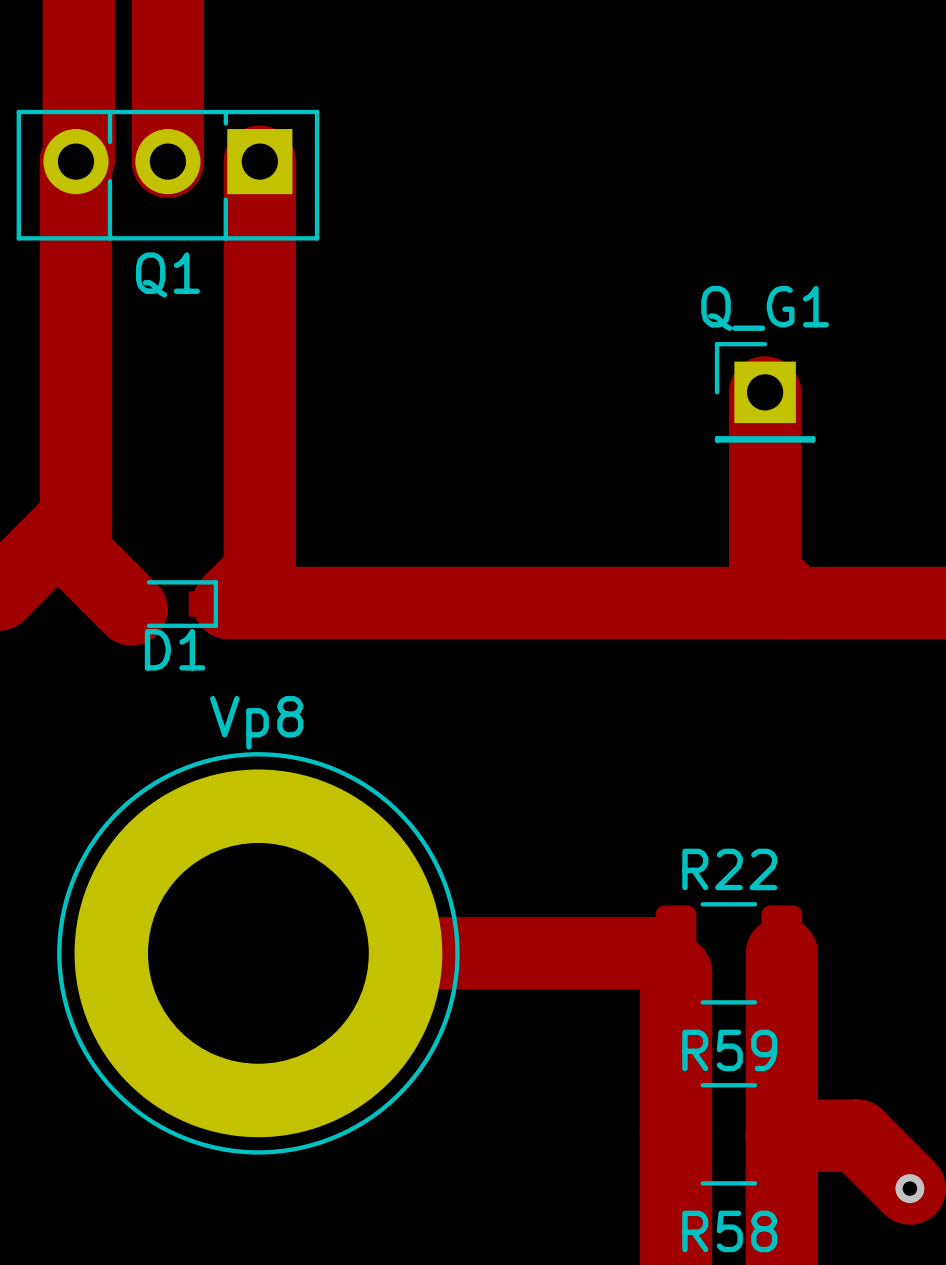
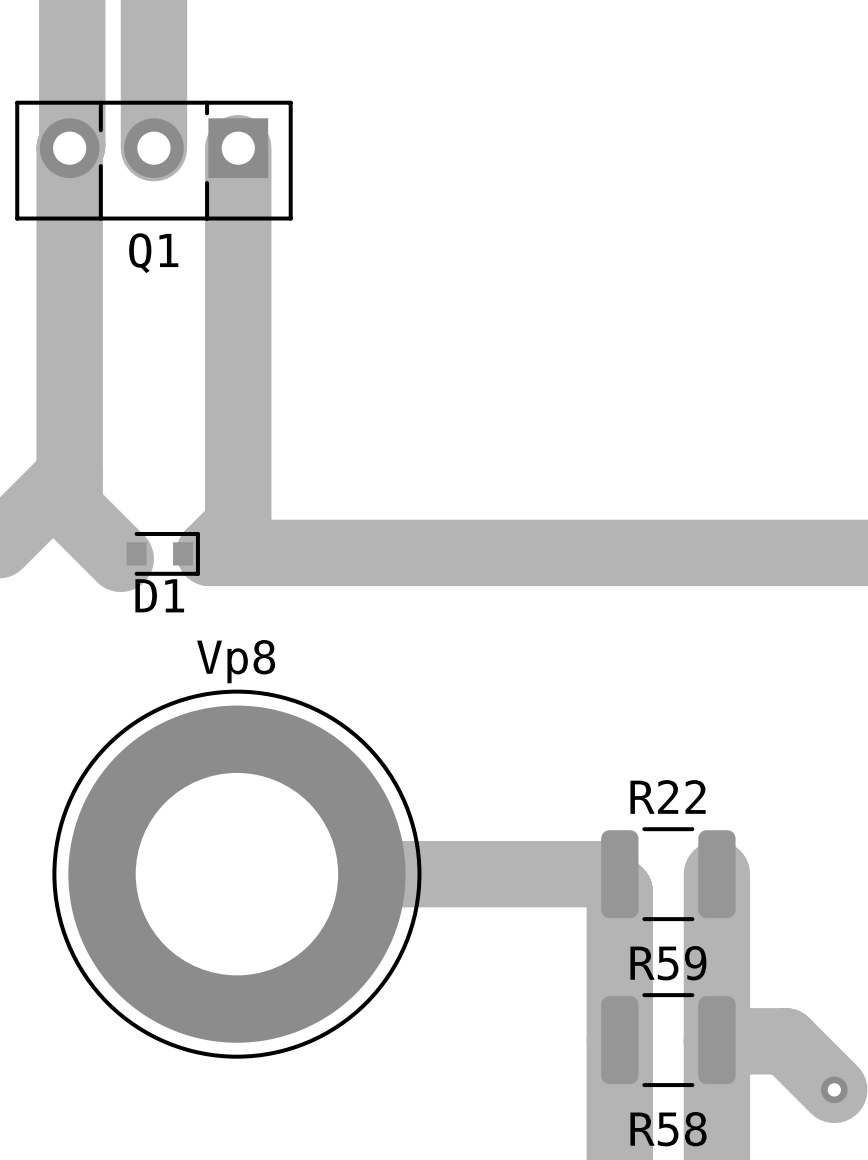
track: (765, 392) (765, 573) (794, 602) -> none
Q_G1: (765, 392) -> none

